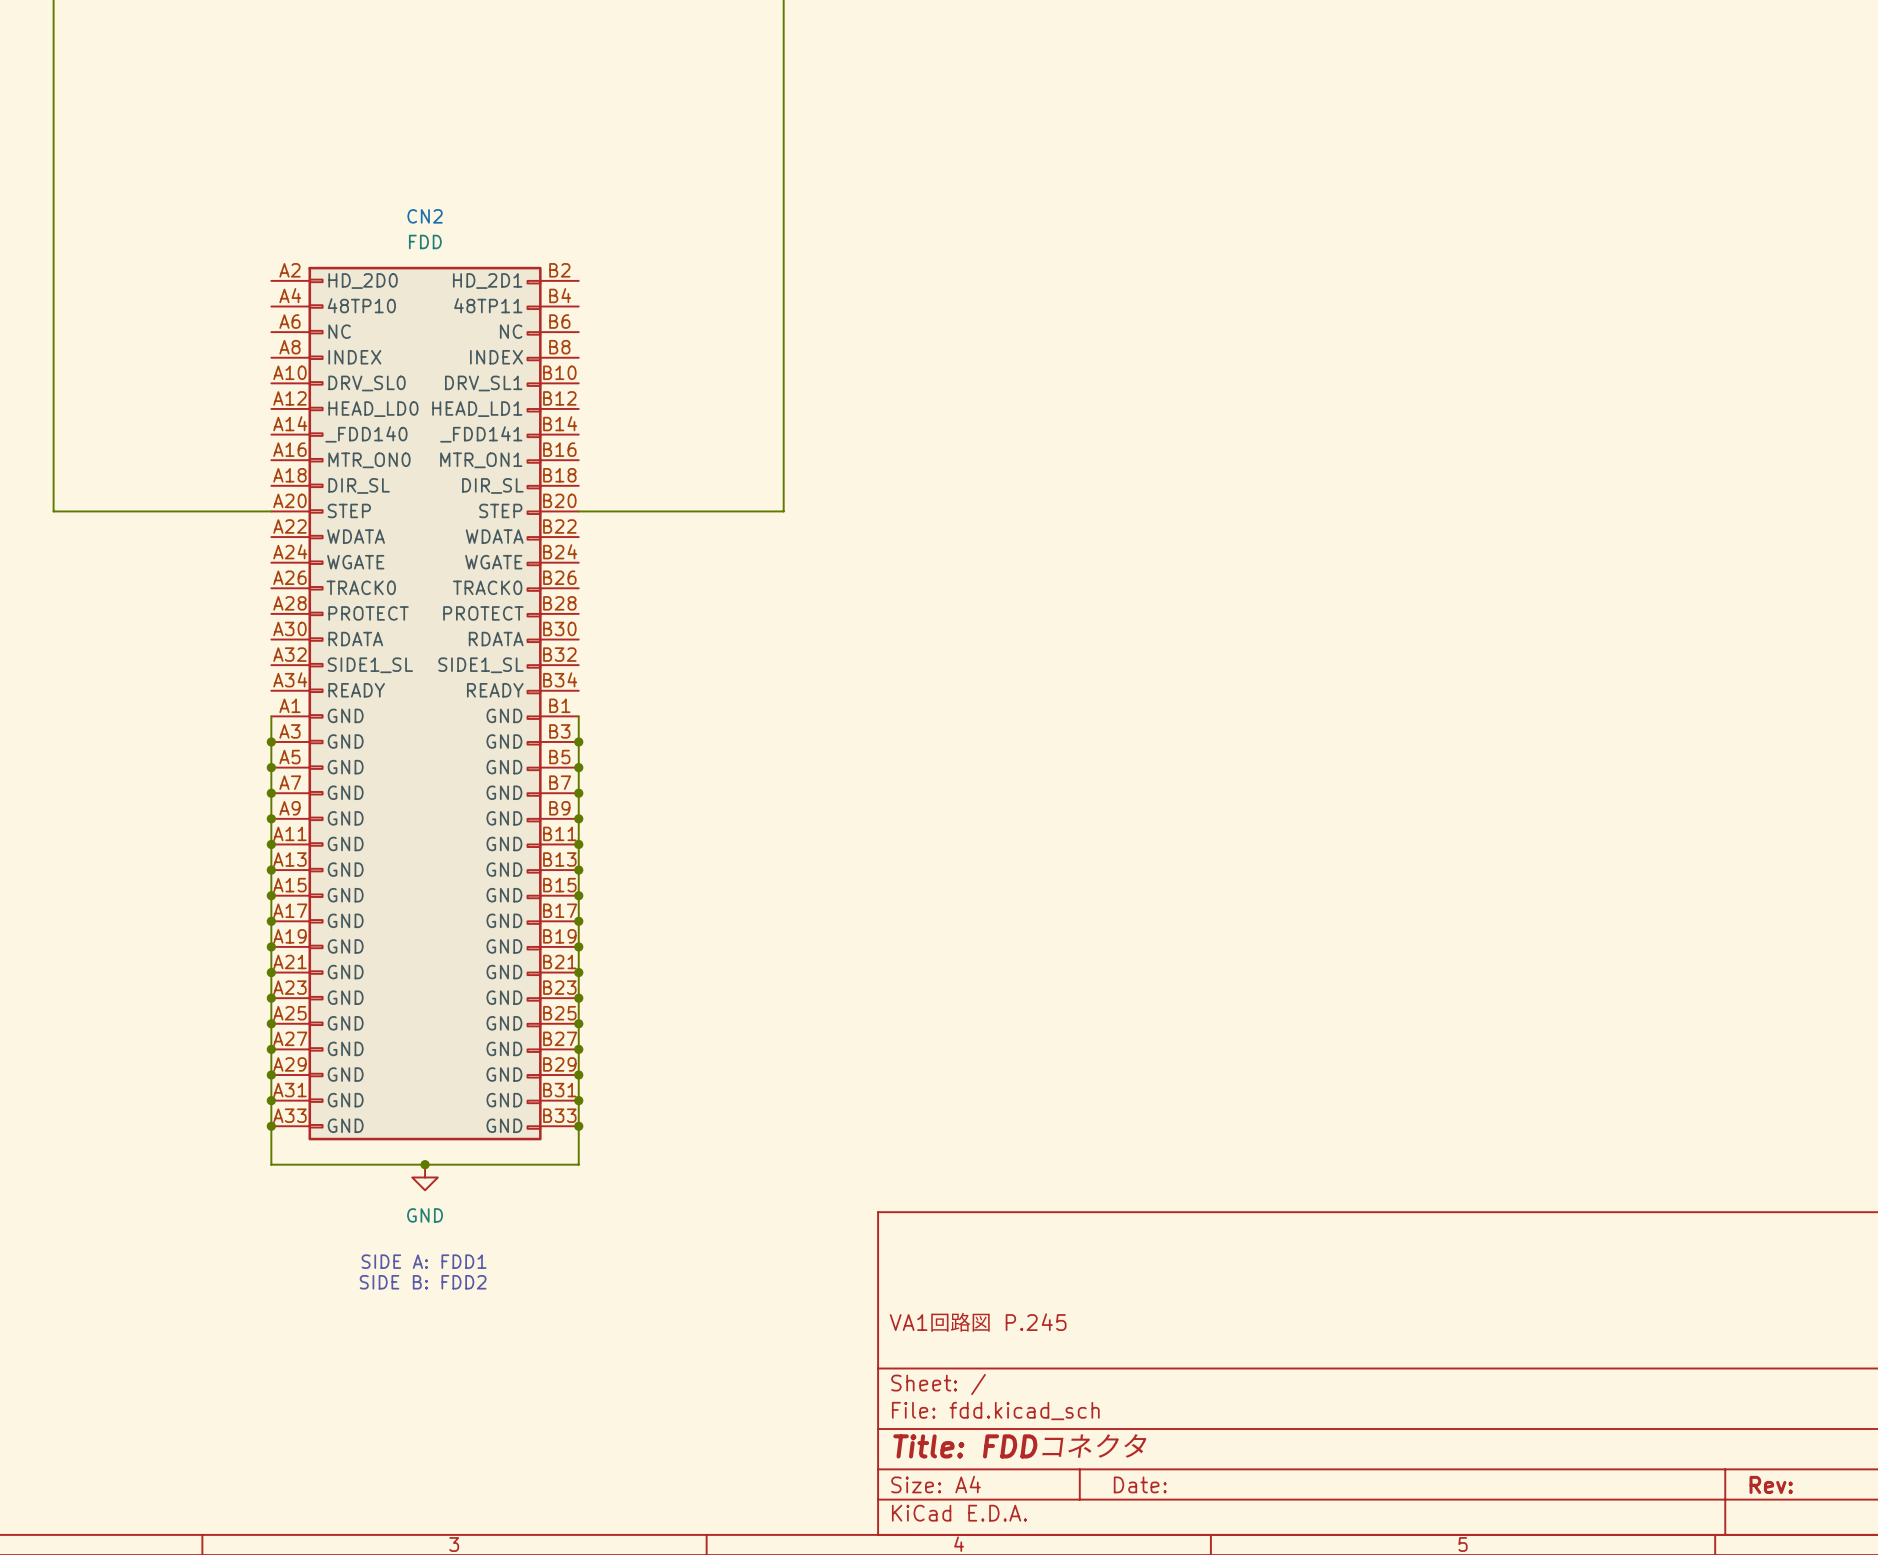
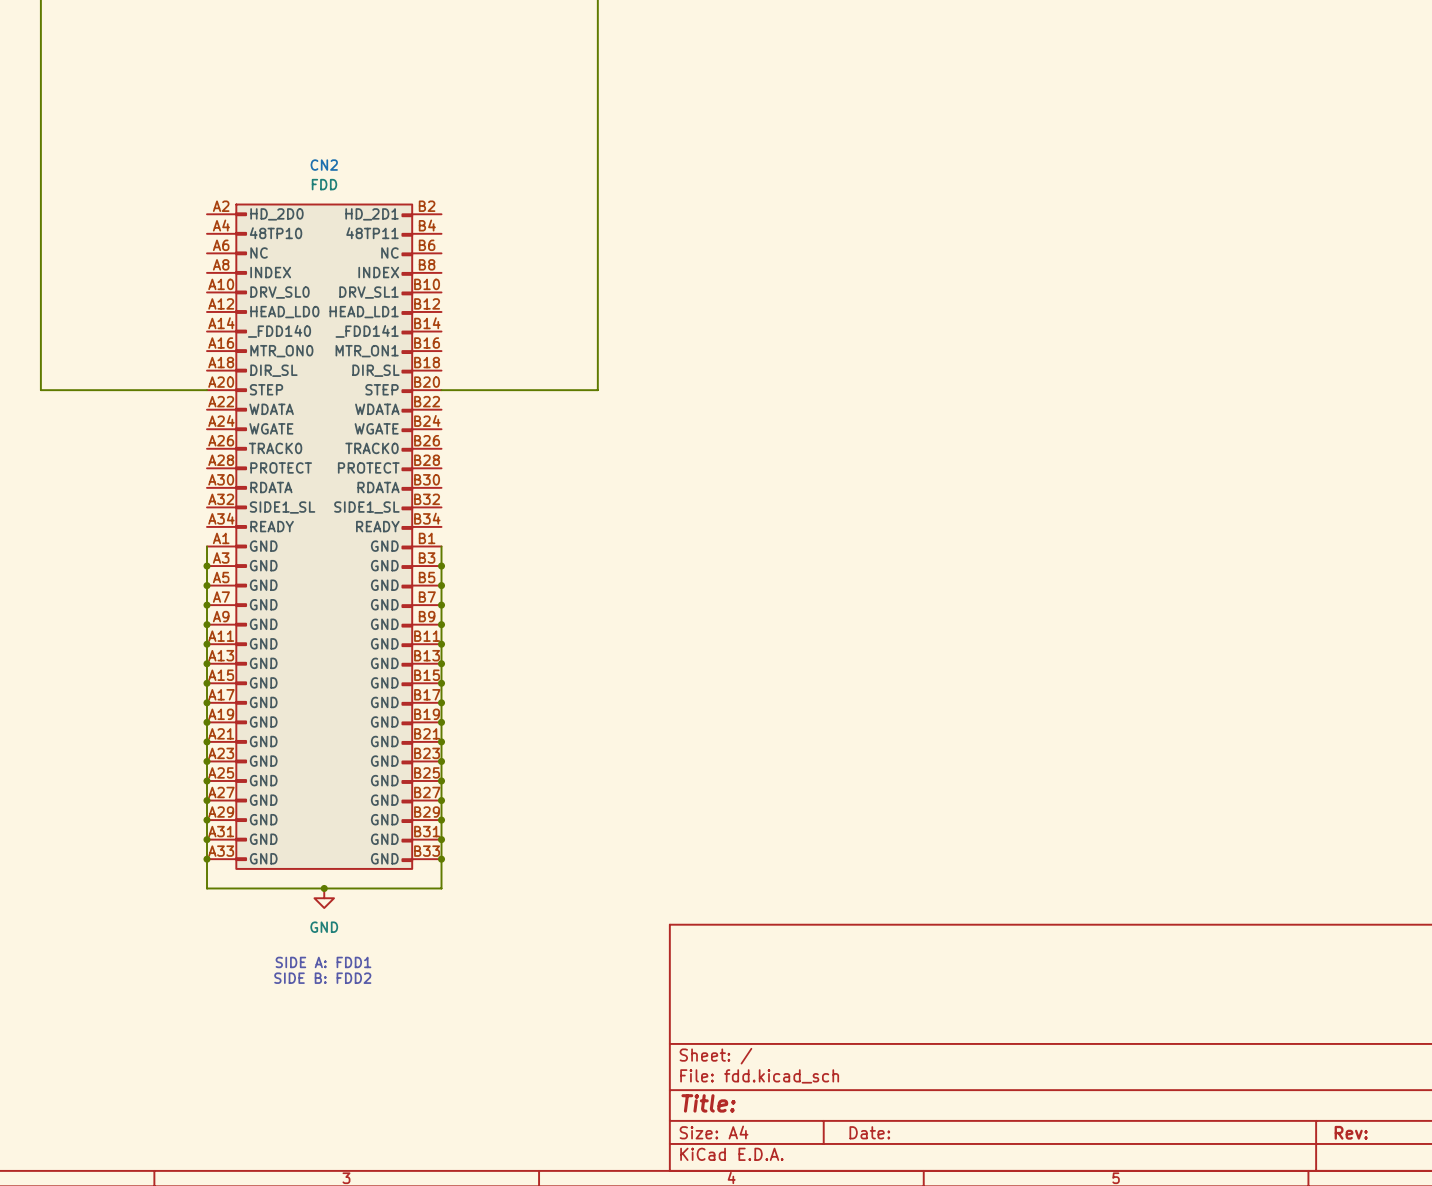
title block: VA1回路図 P.245 (978, 1322) -> none
title block: Title: FDDコネクタ (1020, 1445) -> Title: (708, 1103)

